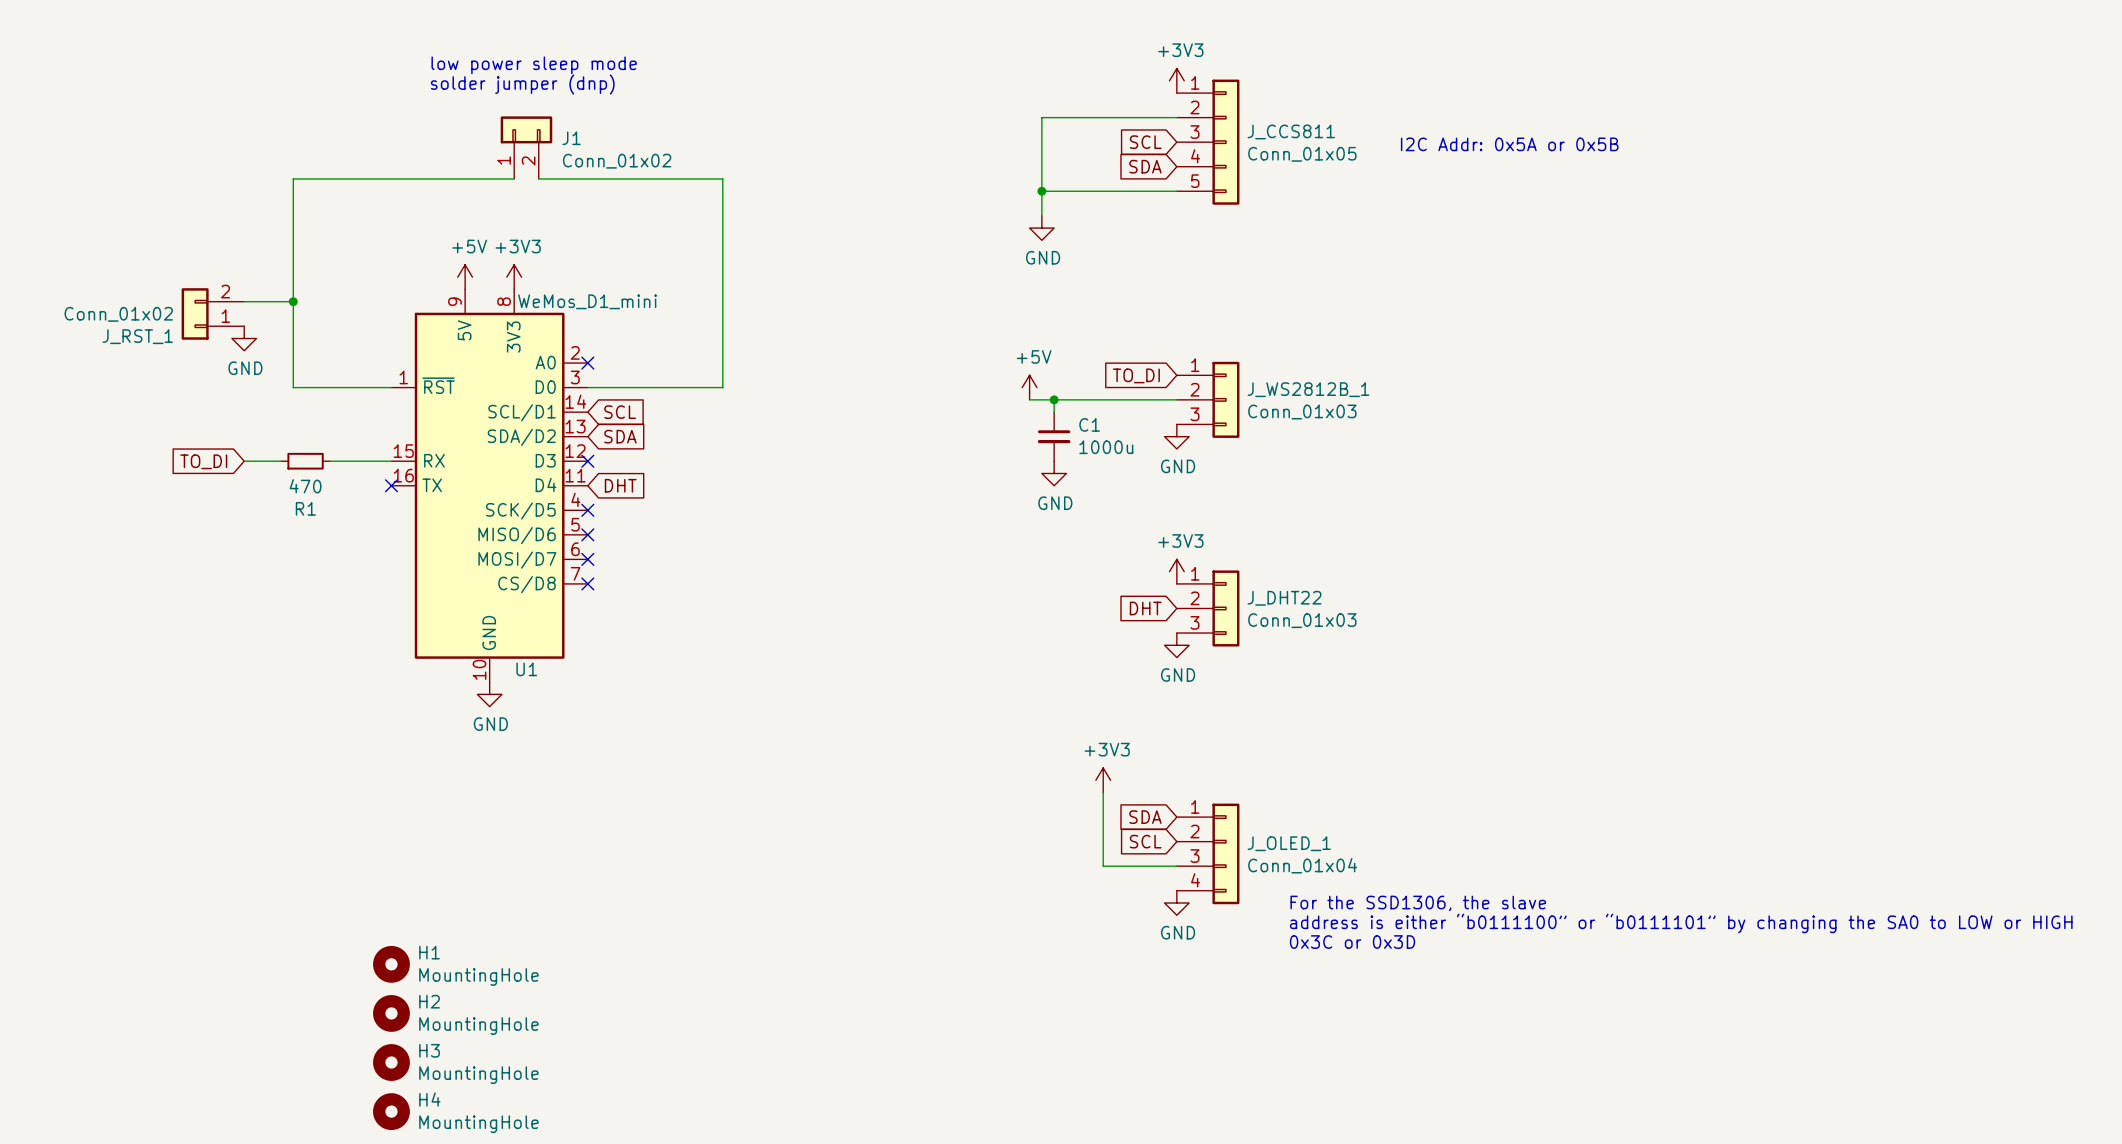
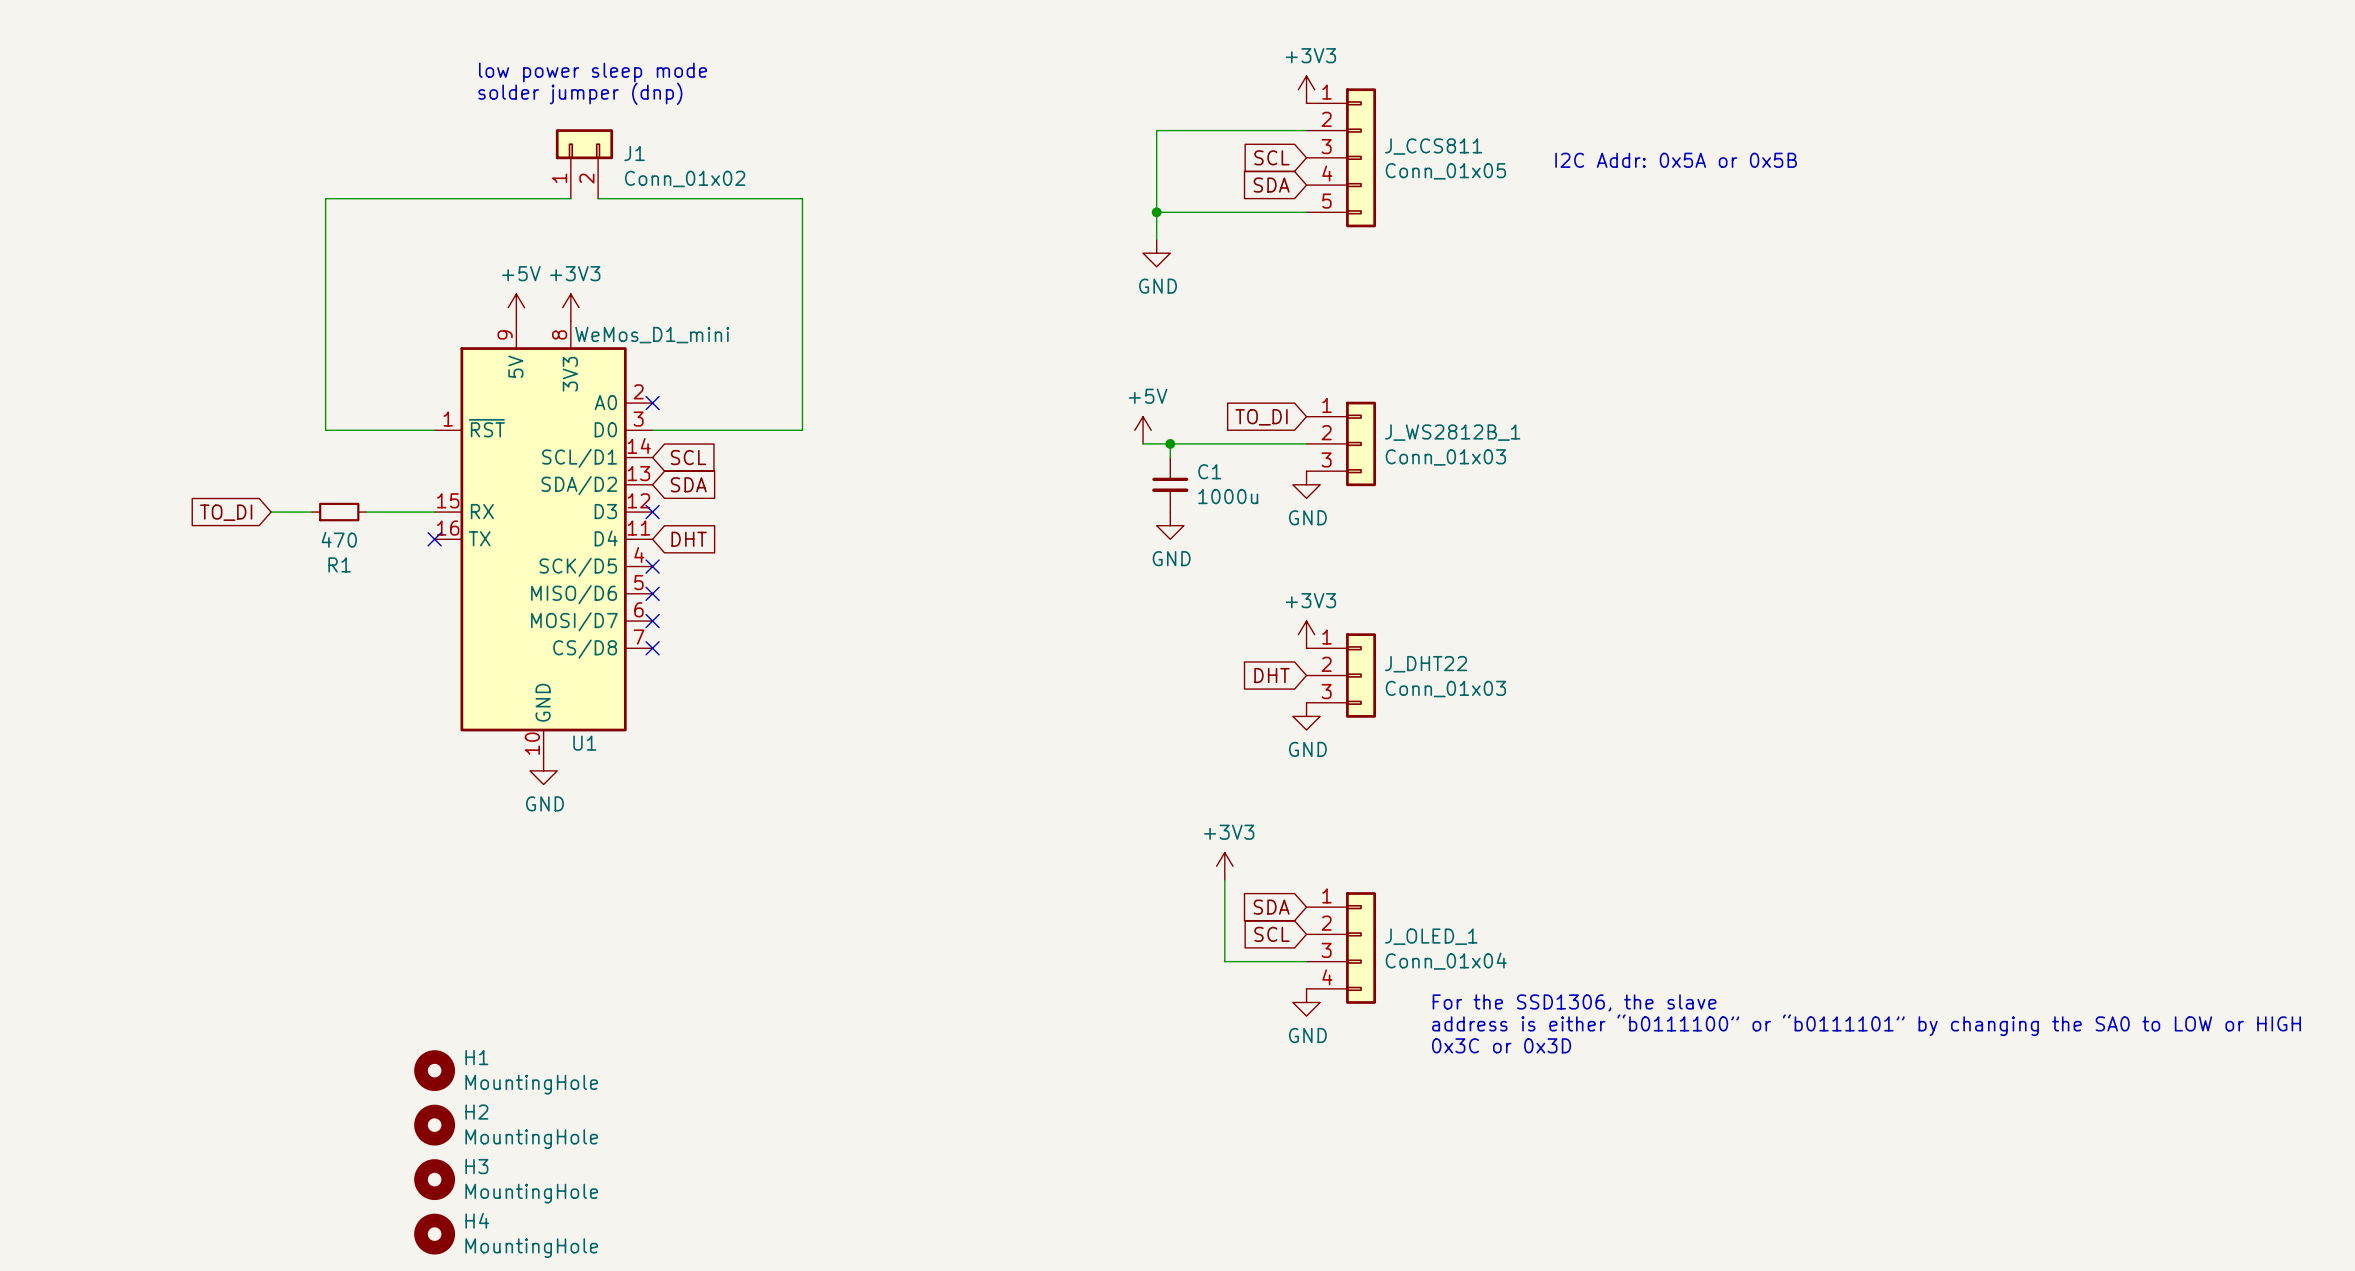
wire: (244, 301) (293, 301) -> none
junction: (293, 301) -> none
J_RST_1: Conn_01x02 (212, 313) -> none
power symbol: GND (244, 338) -> none

